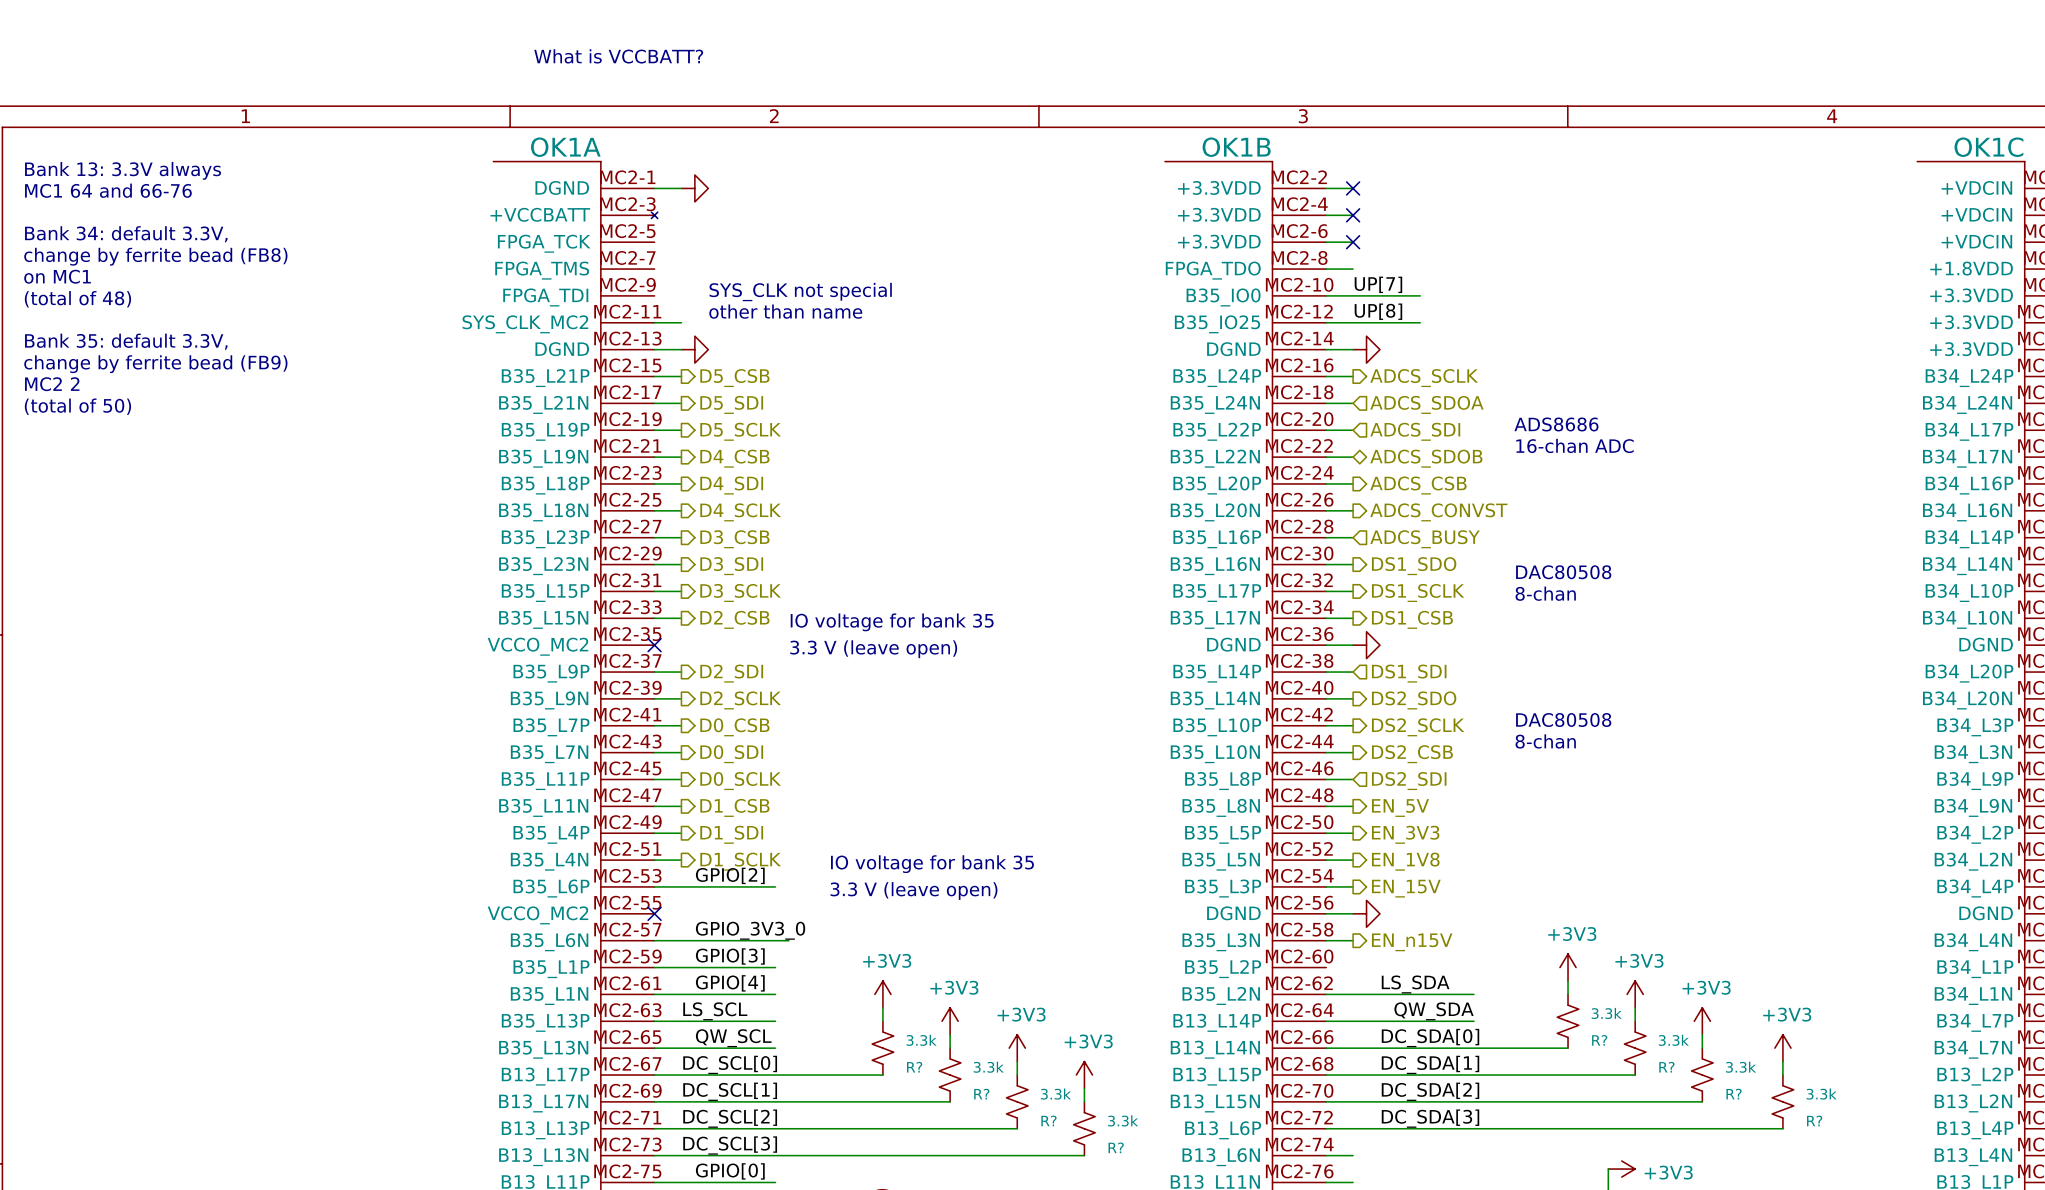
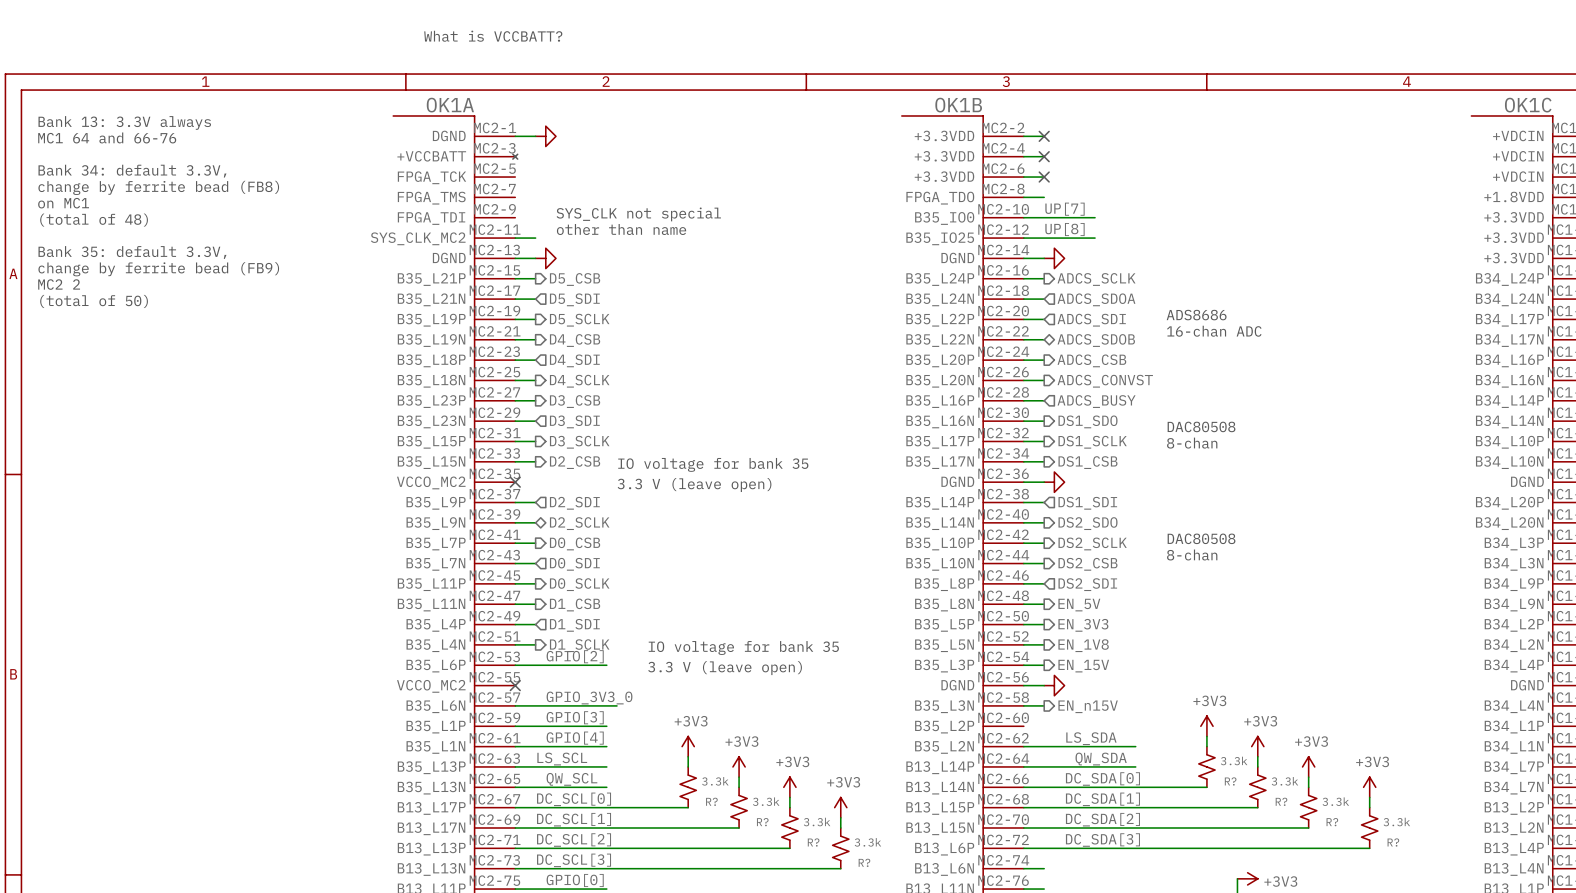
hierarchical label shape: output (731, 404) -> input (574, 299)
hierarchical label shape: output (731, 485) -> input (574, 360)
hierarchical label shape: output (731, 566) -> input (574, 421)
hierarchical label shape: output (731, 673) -> input (574, 503)
hierarchical label shape: output (740, 700) -> bidirectional (579, 523)
hierarchical label shape: output (731, 754) -> input (574, 564)
hierarchical label shape: output (731, 834) -> input (574, 625)

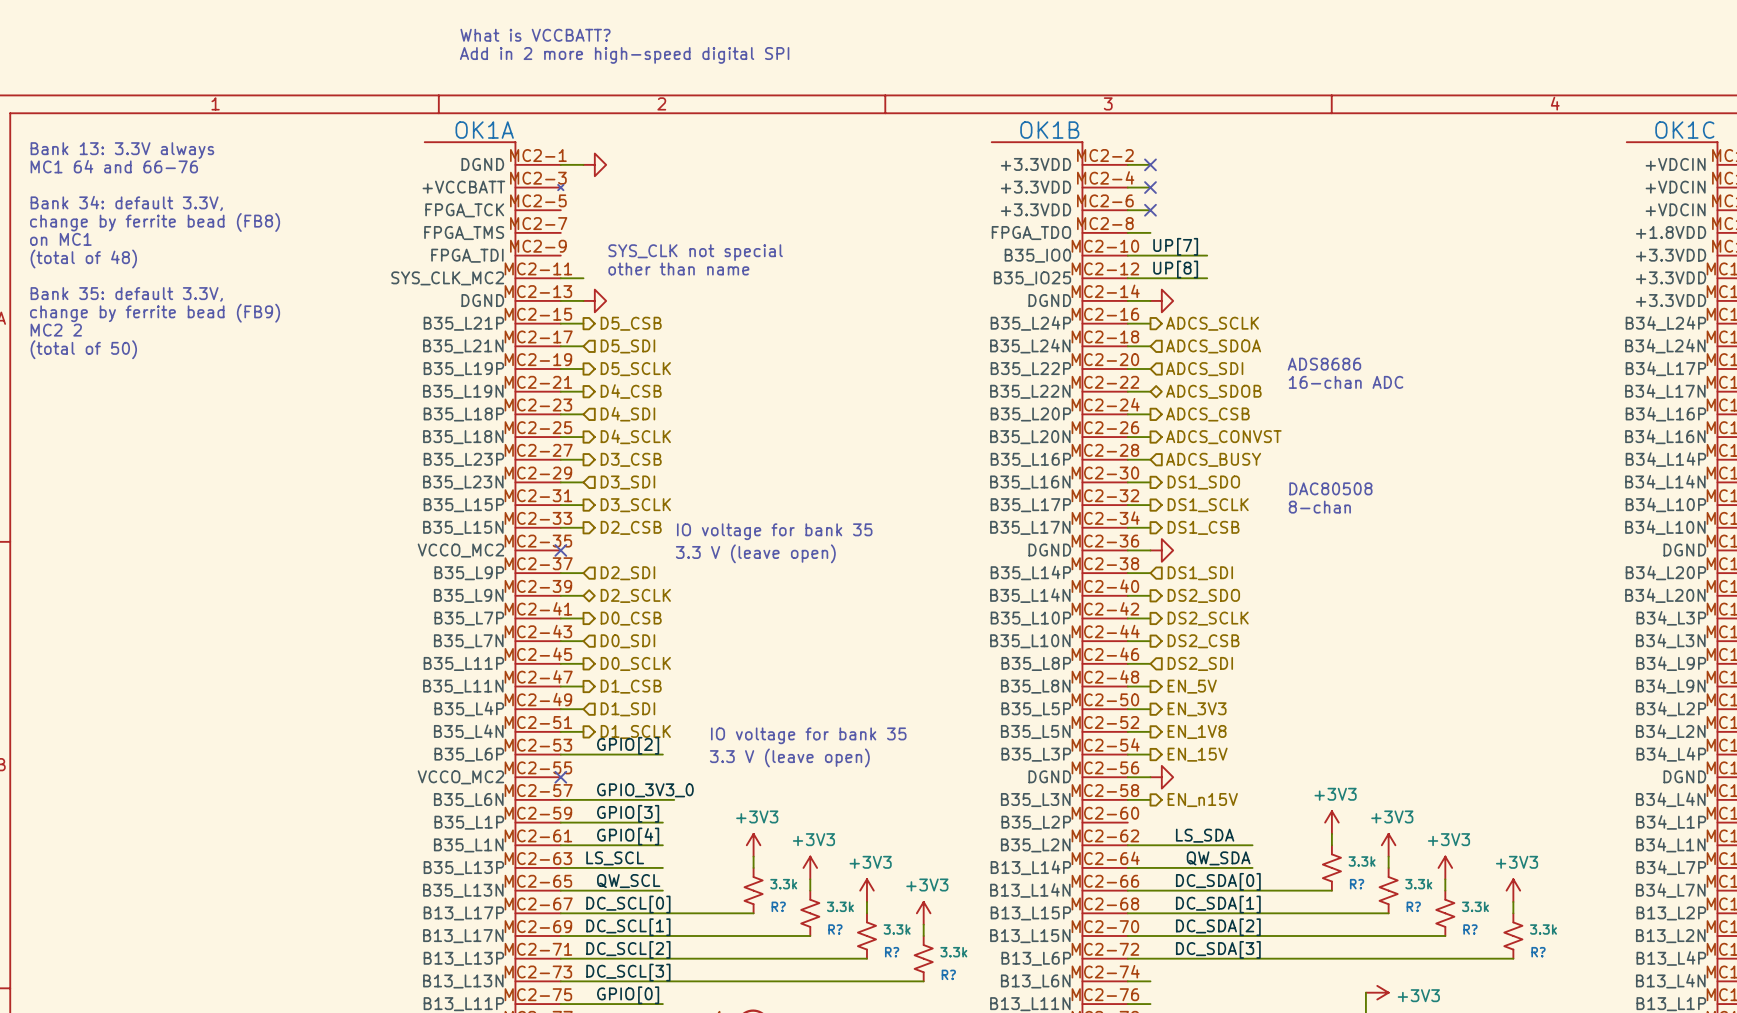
text: none -> What is VCCBATT? (535, 35)
text: What is VCCBATT? (493, 36) -> Add in 2 more high-speed digital SPI (624, 55)
text: DAC80508 (1201, 538) -> none
text: 8-chan (1192, 554) -> none

